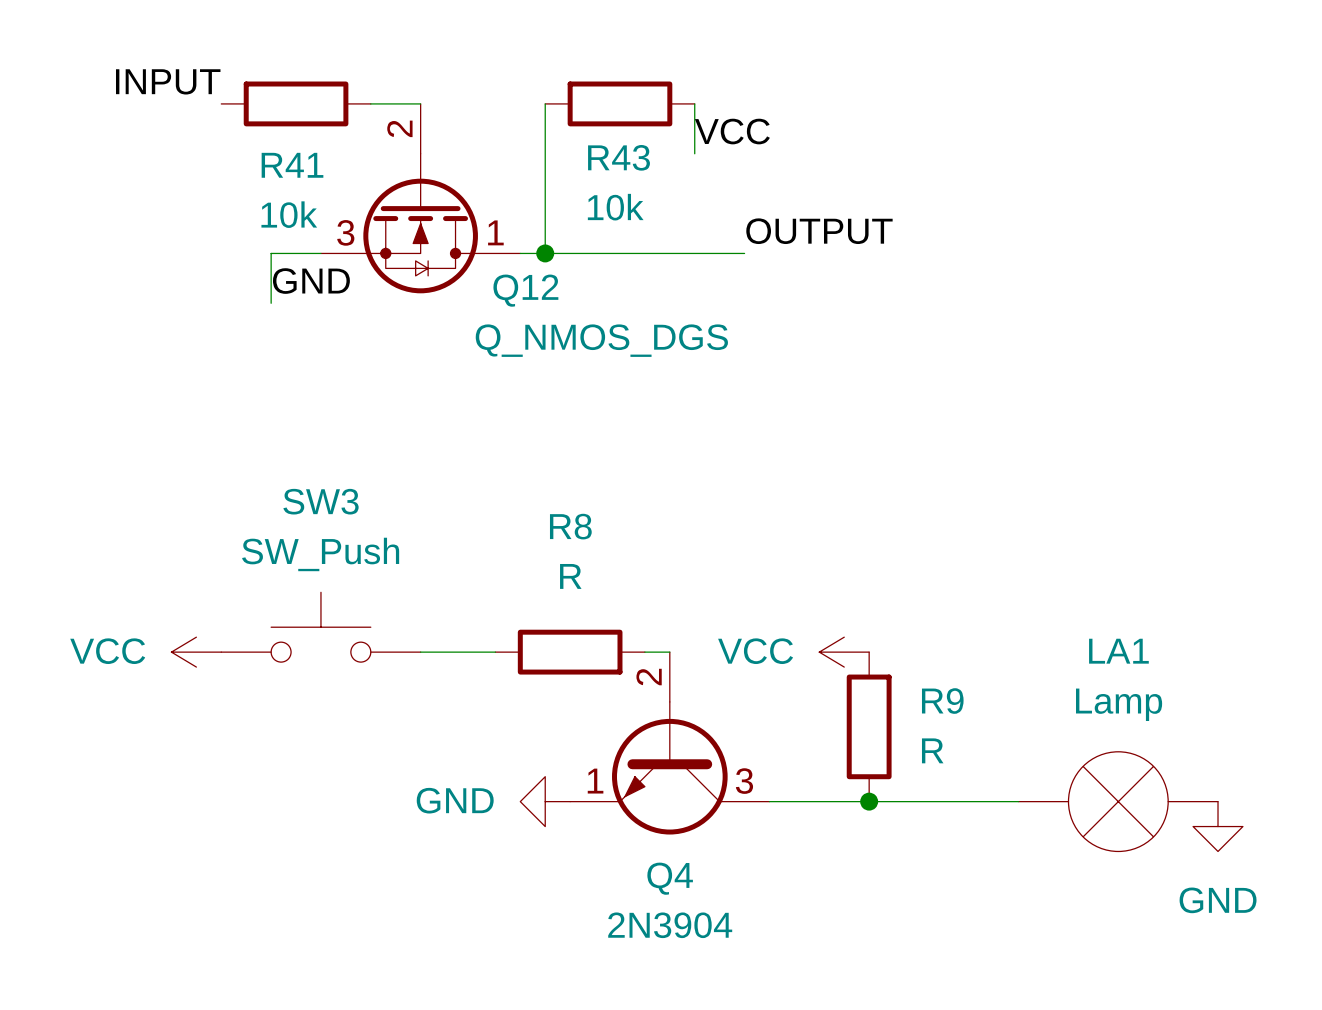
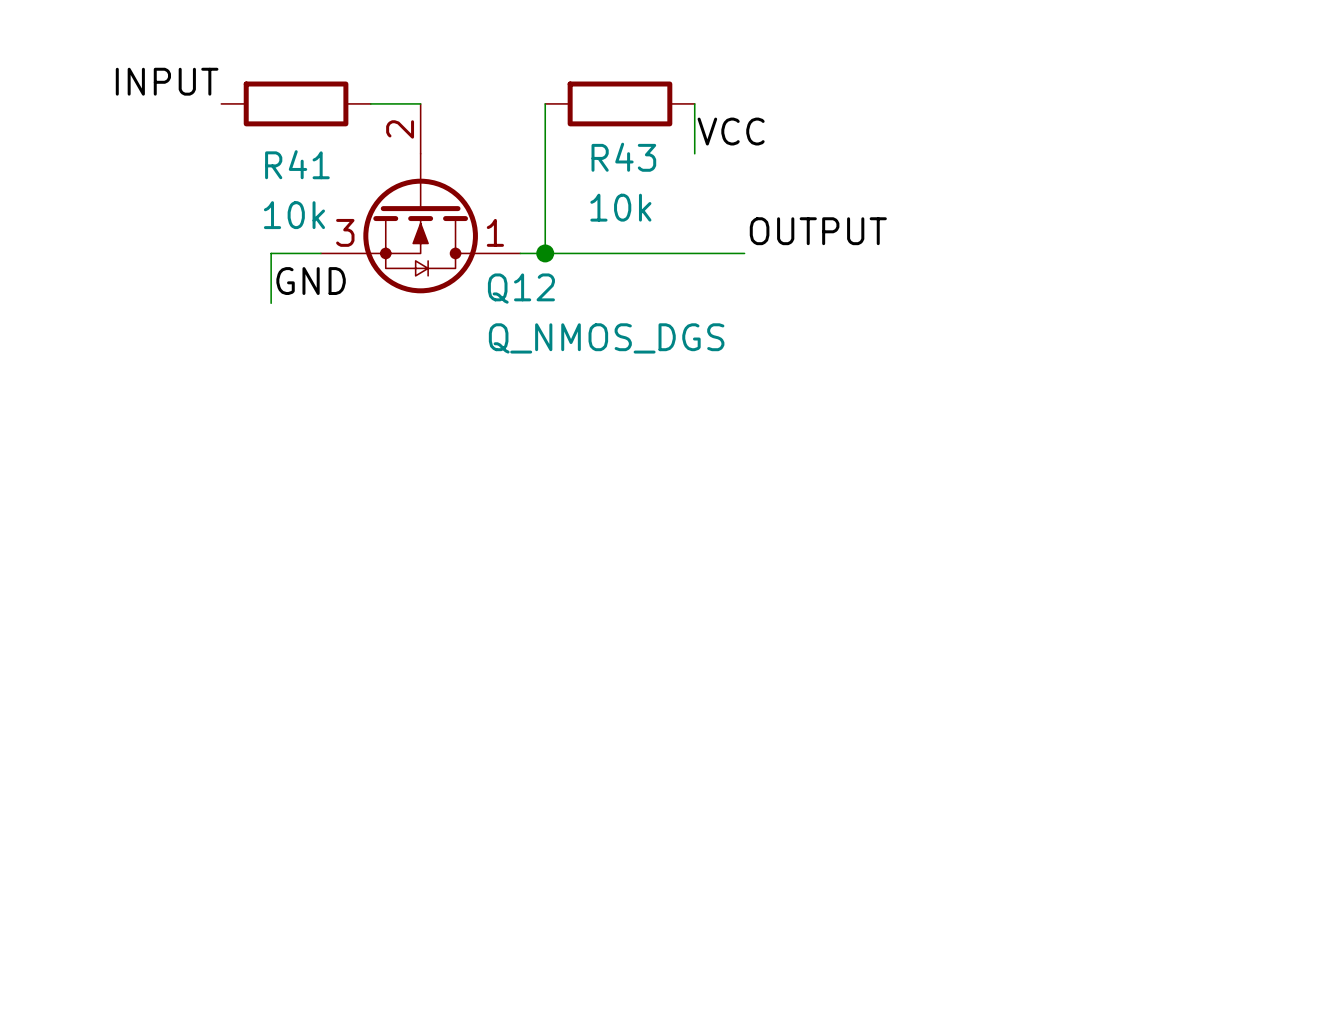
SW3: SW_Push (320, 627) -> none
power symbol: VCC (196, 652) -> none
wire: (420, 652) (495, 652) -> none
R8: R (570, 652) -> none
wire: (644, 652) (669, 652) -> none
power symbol: VCC (844, 652) -> none
R9: R (869, 726) -> none
Q4: 2N3904 (669, 743) -> none
power symbol: GND (545, 801) -> none
wire: (769, 801) (1018, 801) -> none
junction: (869, 801) -> none
LA1: Lamp (1118, 801) -> none
power symbol: GND (1218, 826) -> none

